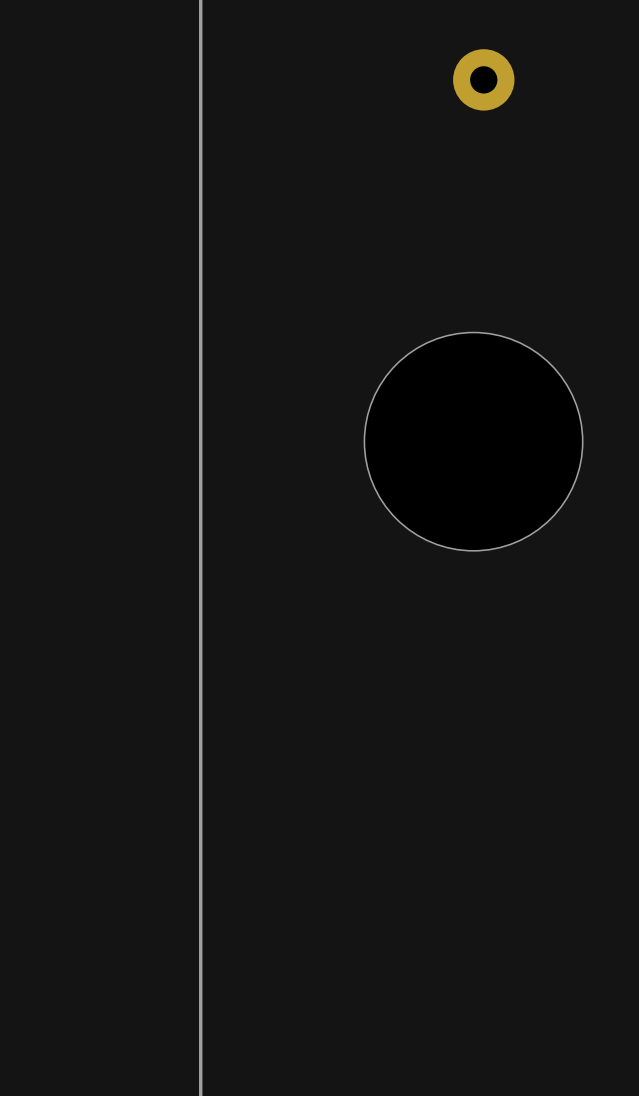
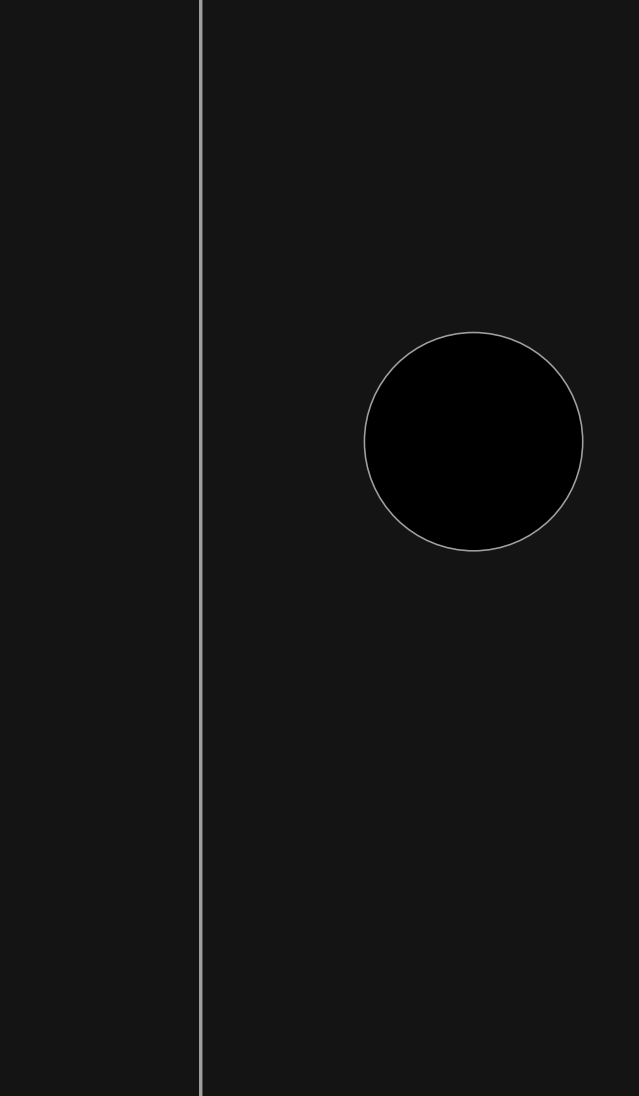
via: (483, 79) -> none

